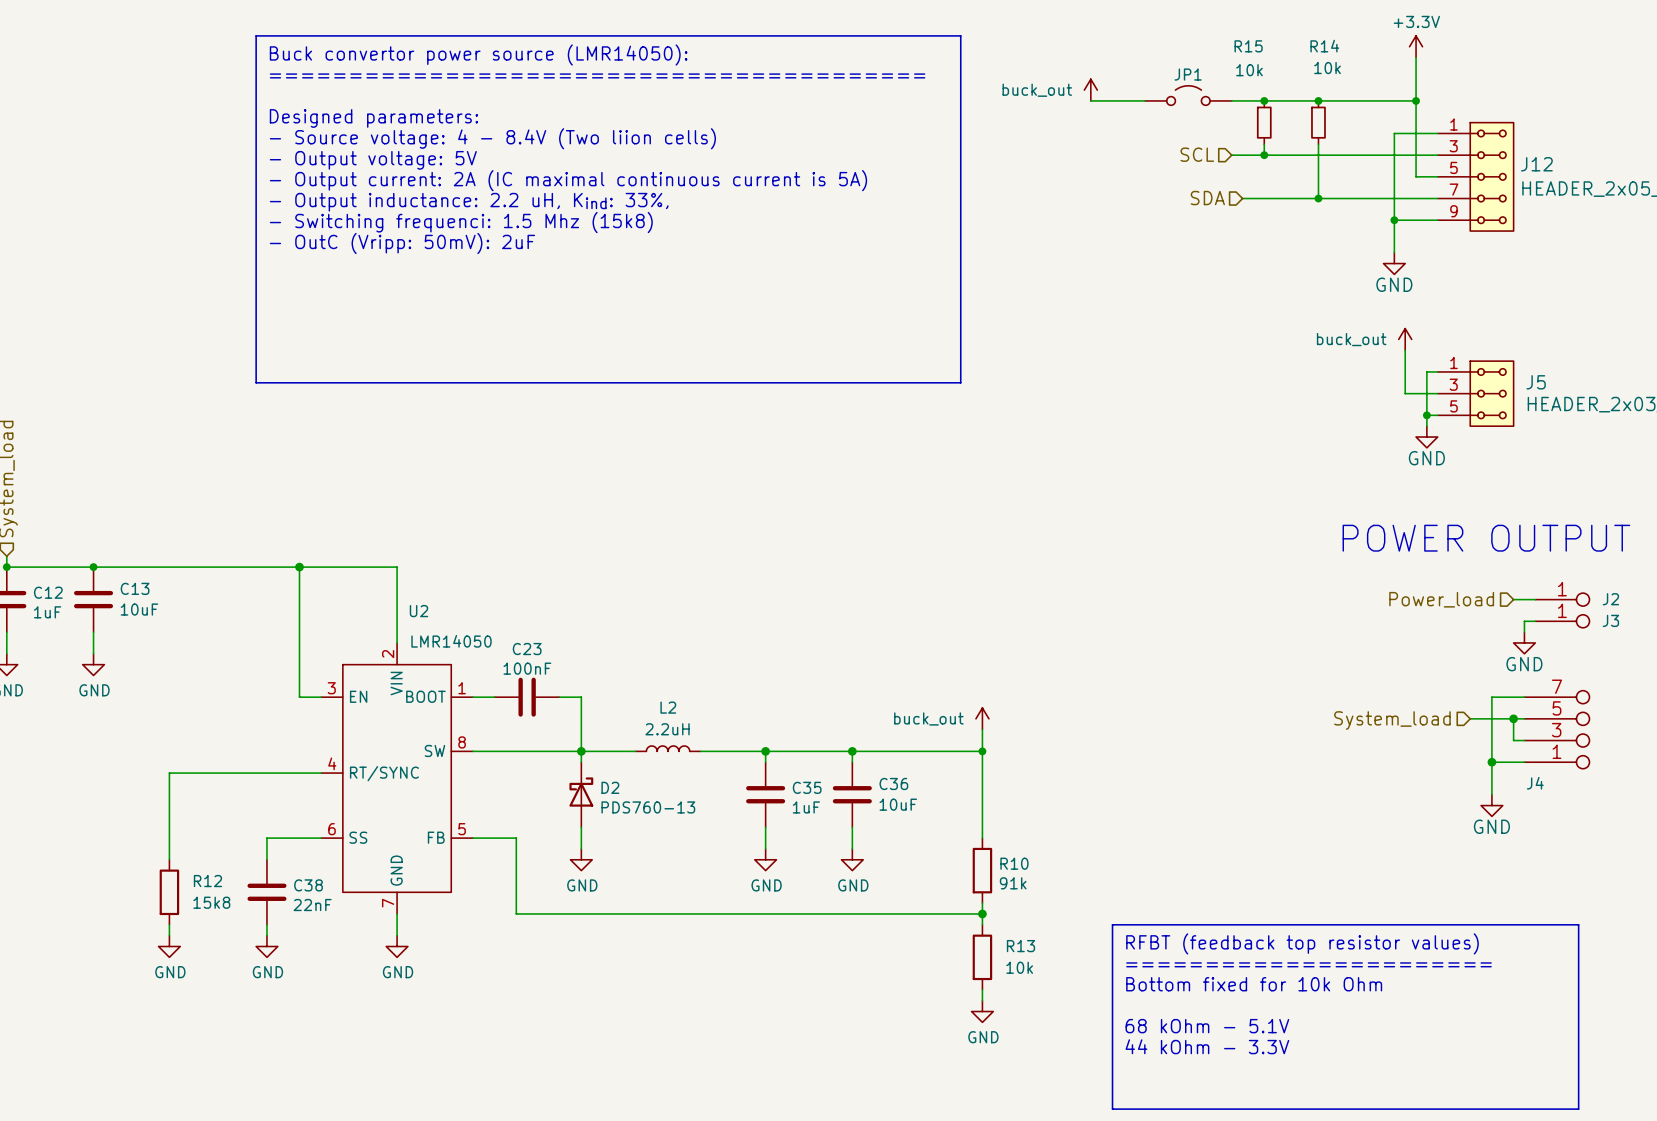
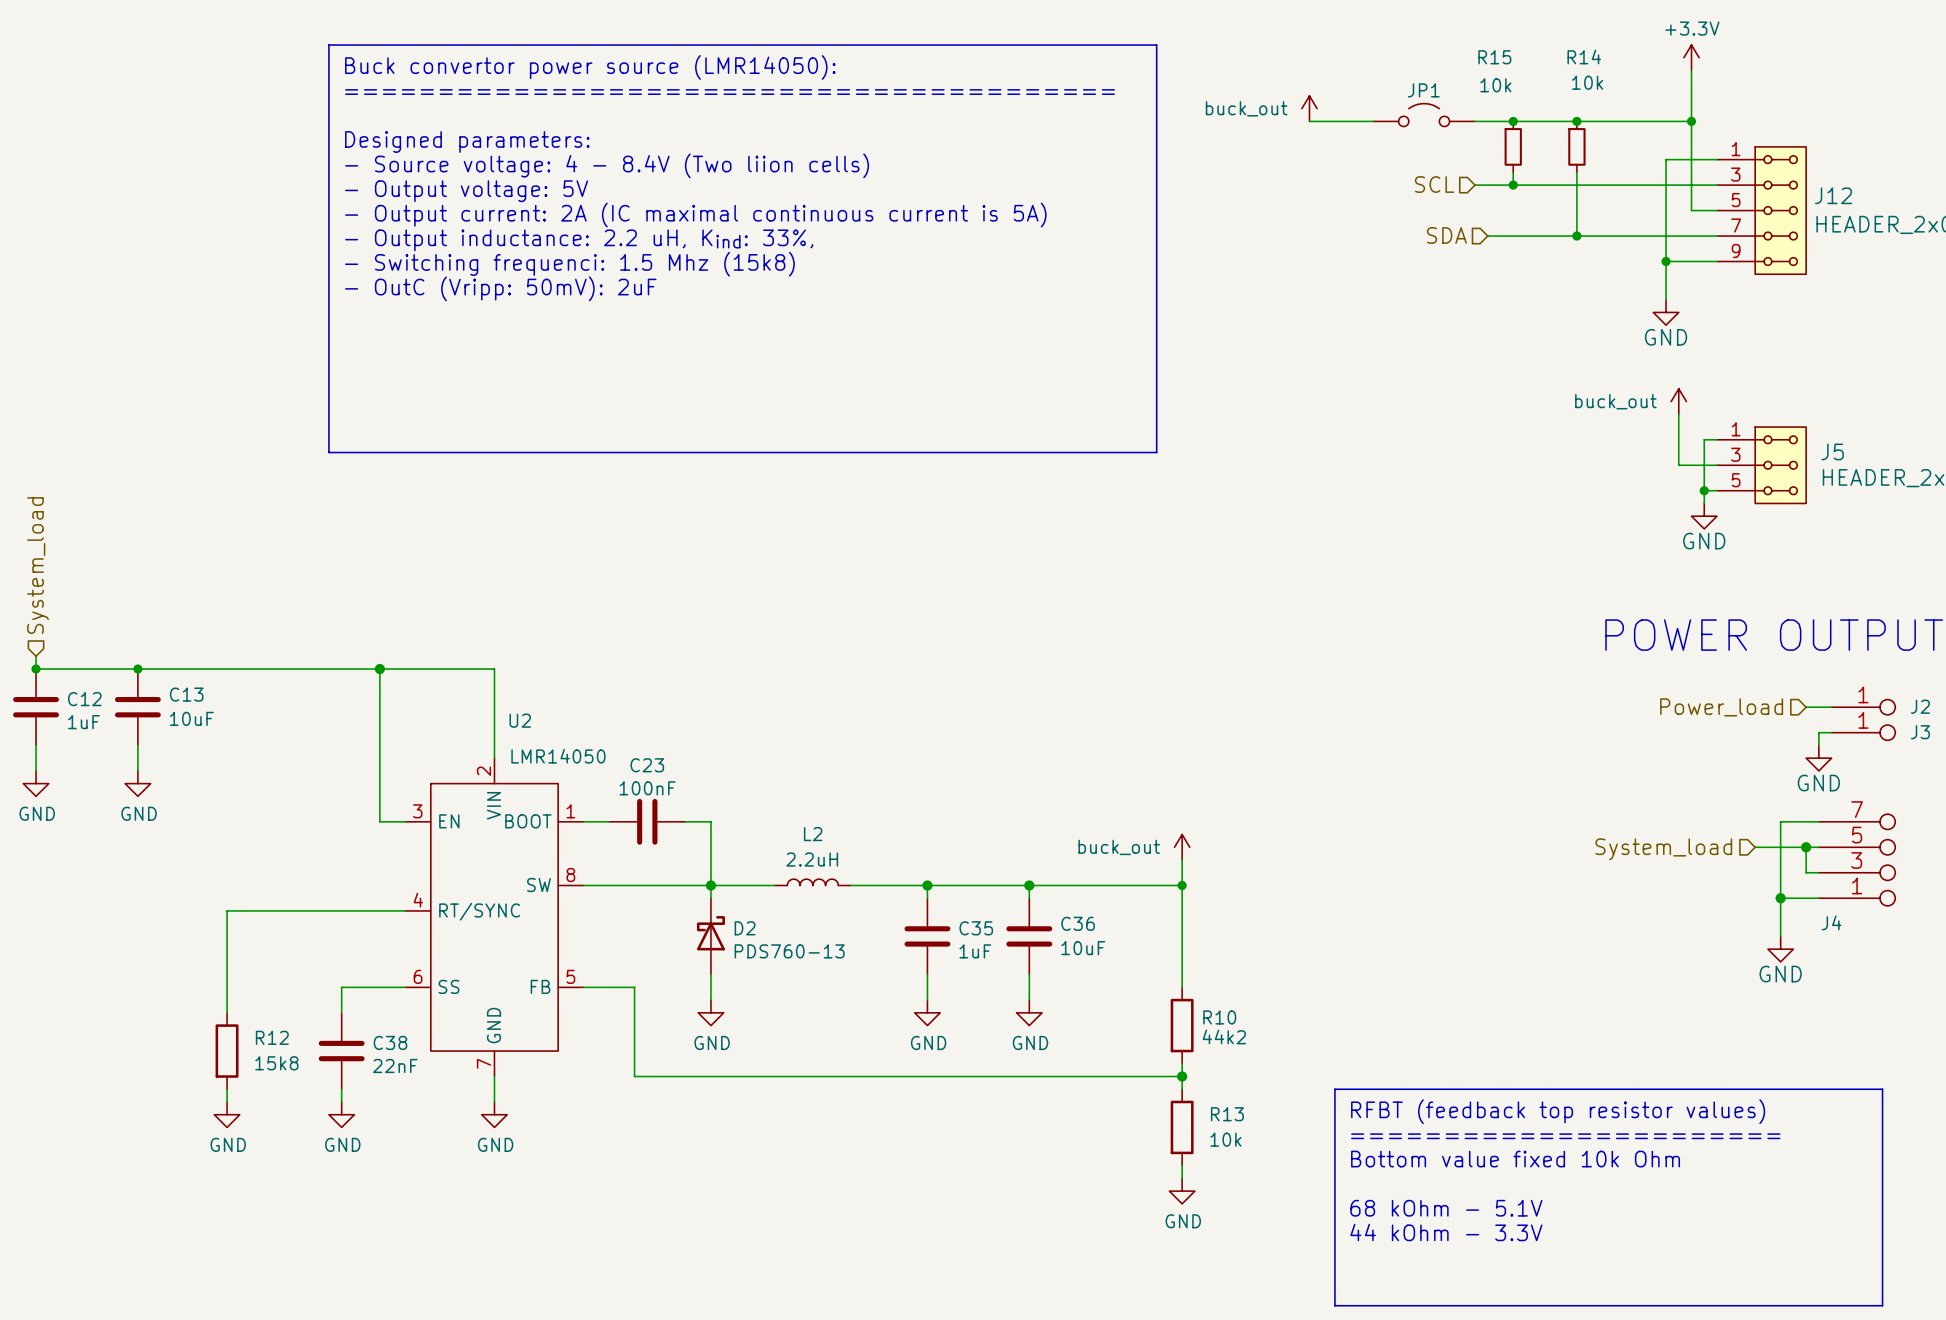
R10 value: 91k (1013, 883) -> 44k2 (1224, 1036)
text: Bottom fixed for 10k Ohm (1254, 984) -> Bottom value fixed 10k Ohm (1515, 1159)

